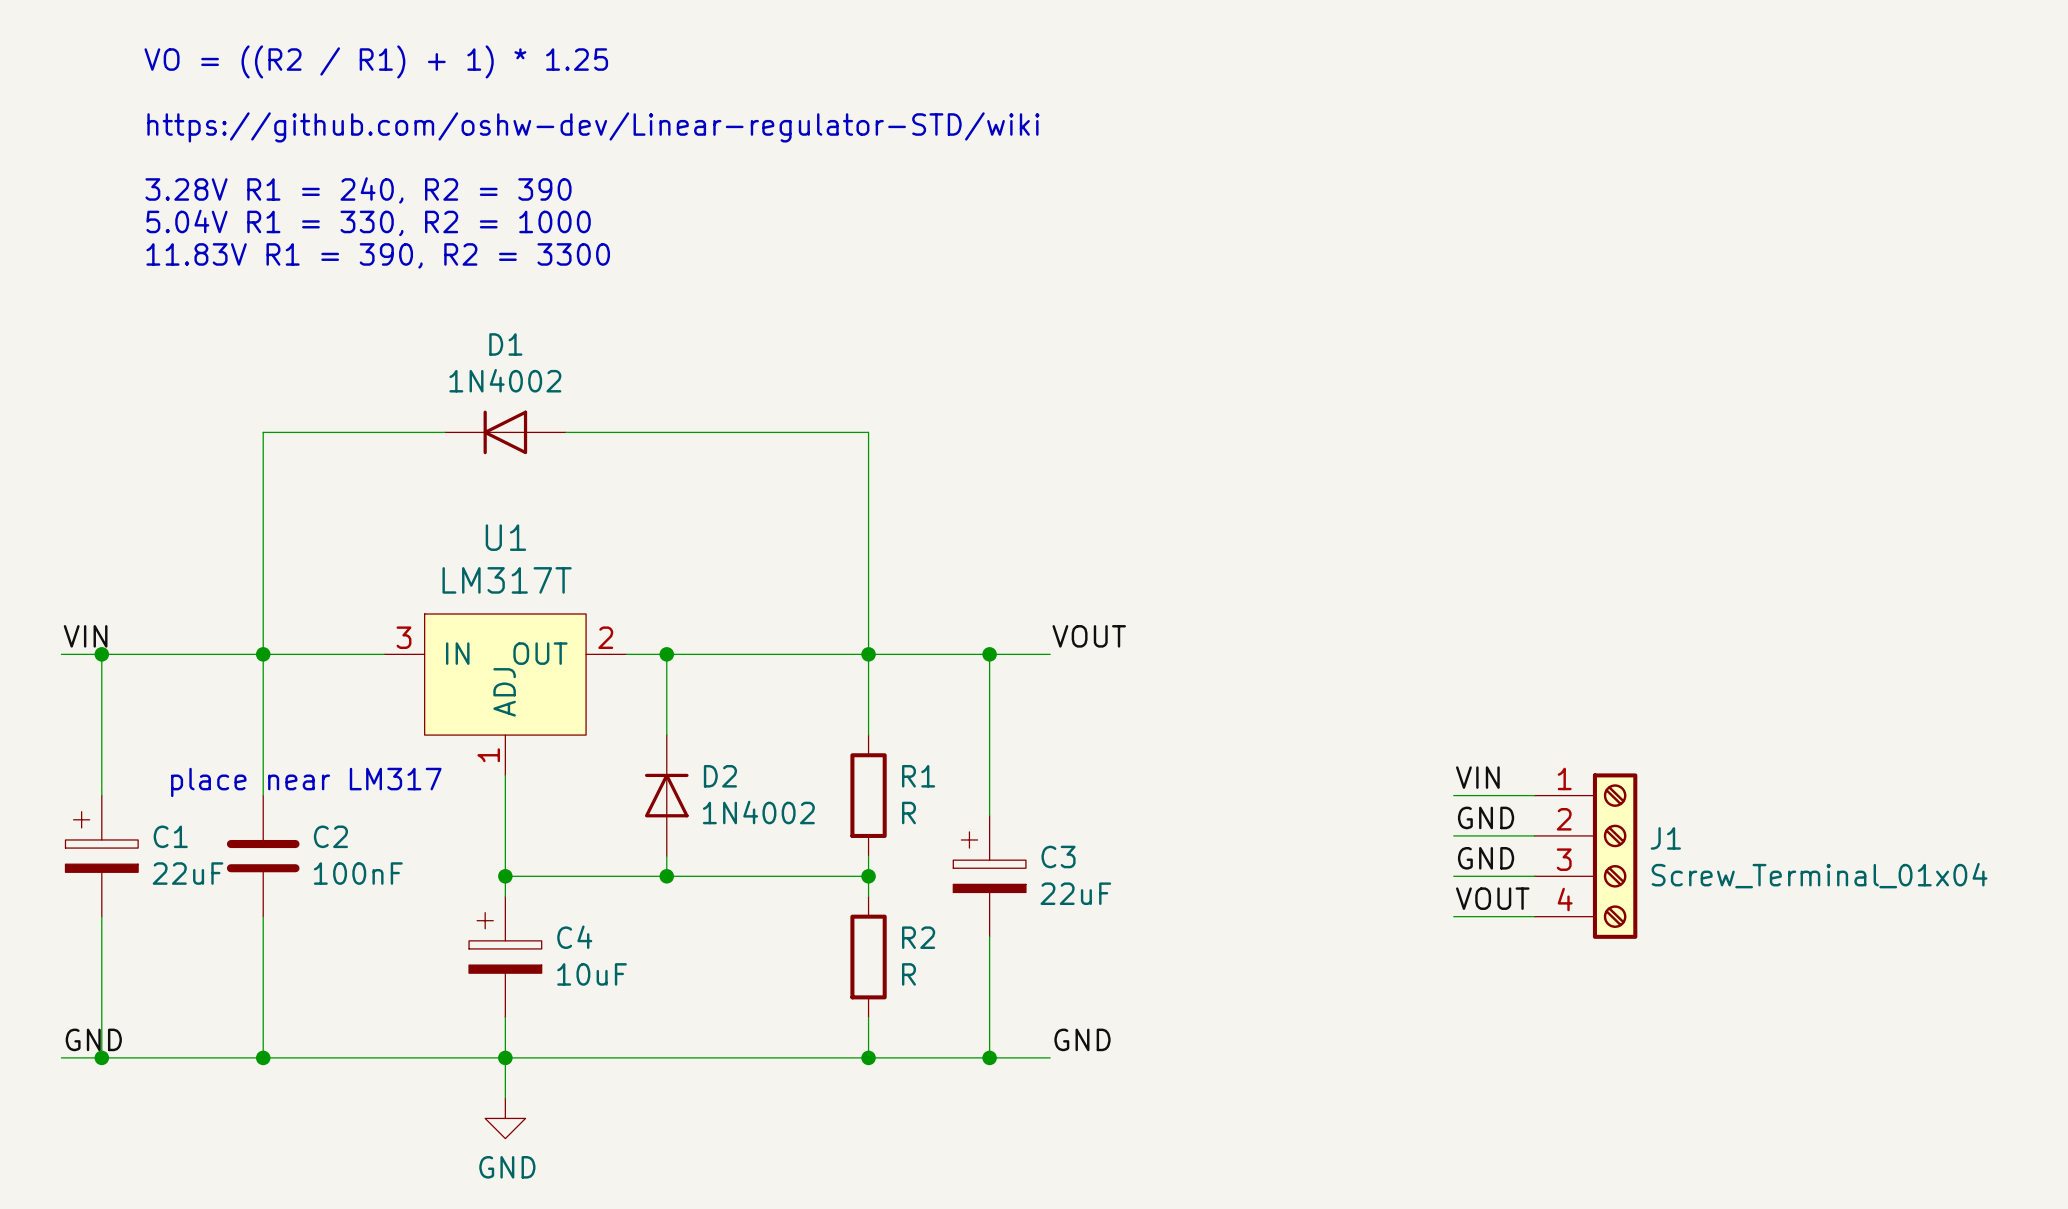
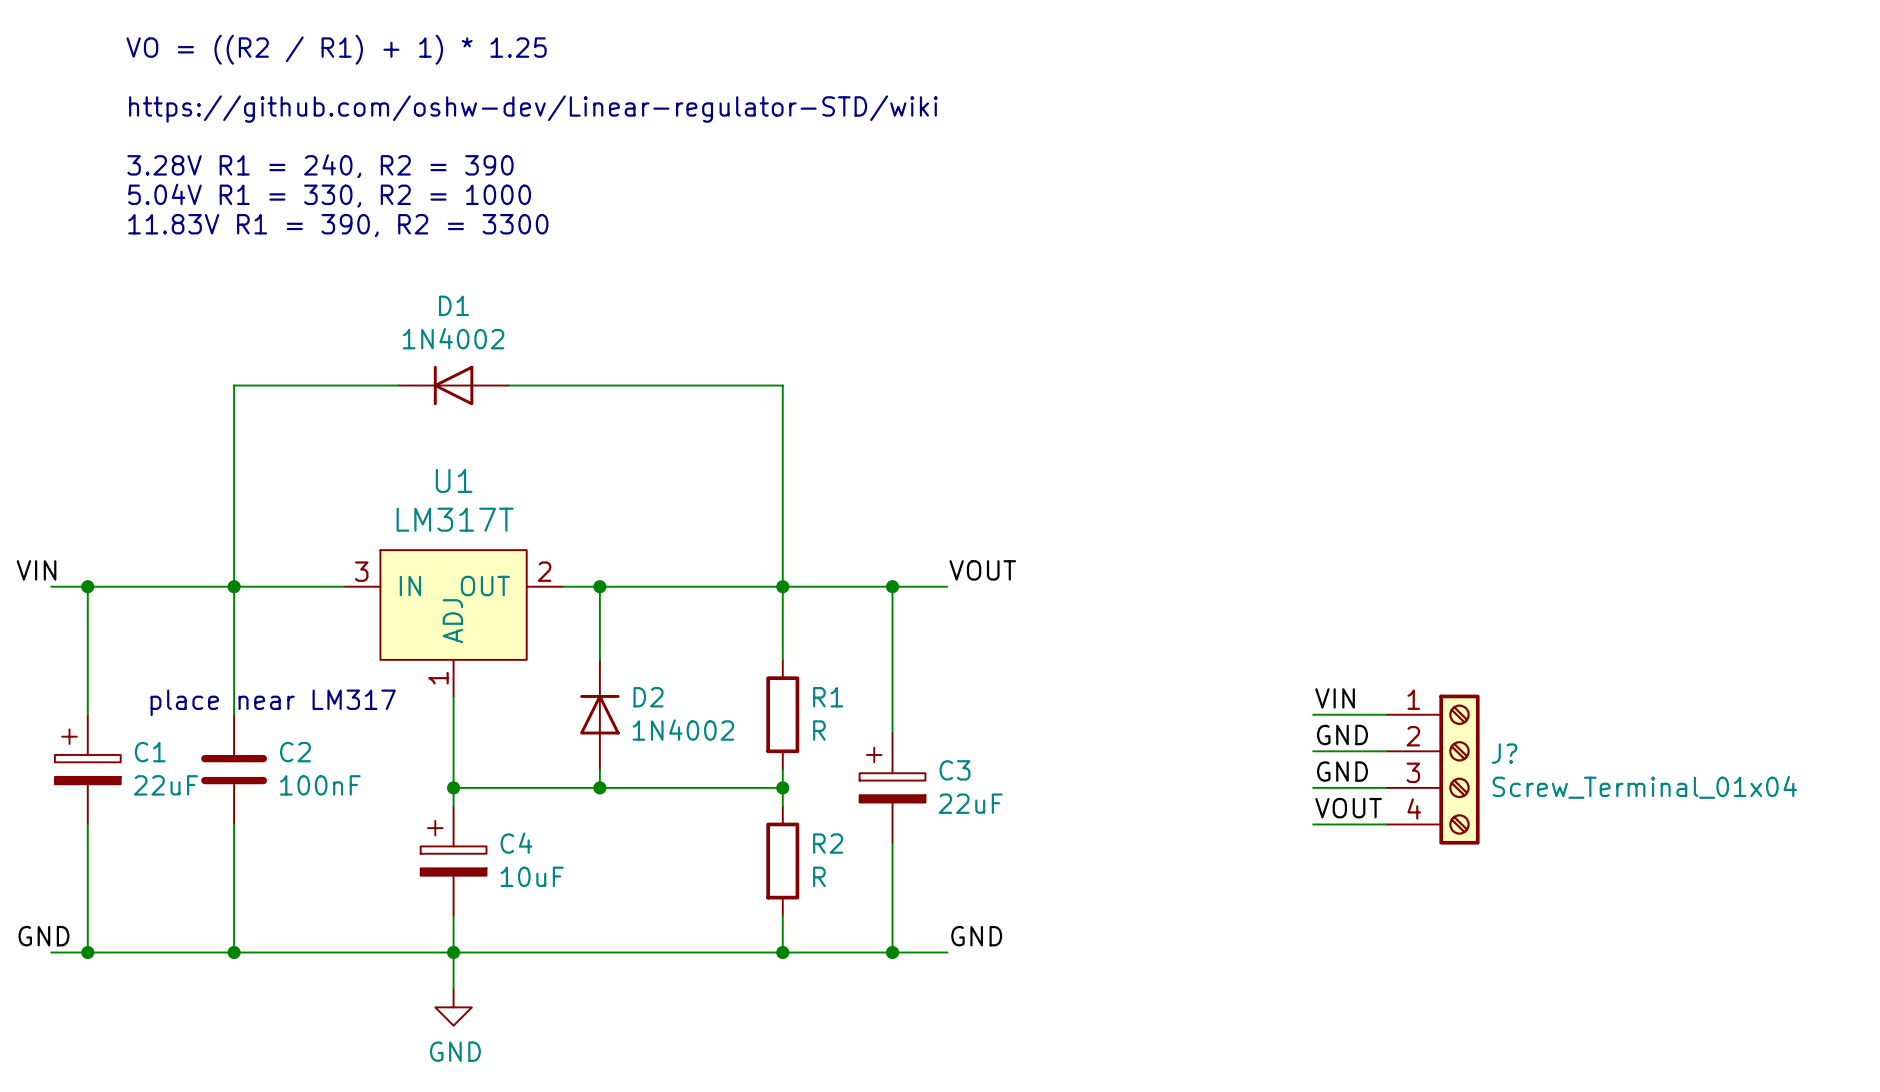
label position: VIN (85, 636) -> VIN (36, 570)
J1 name: J1 (1665, 838) -> J? (1504, 753)
label position: GND (93, 1039) -> GND (43, 936)

